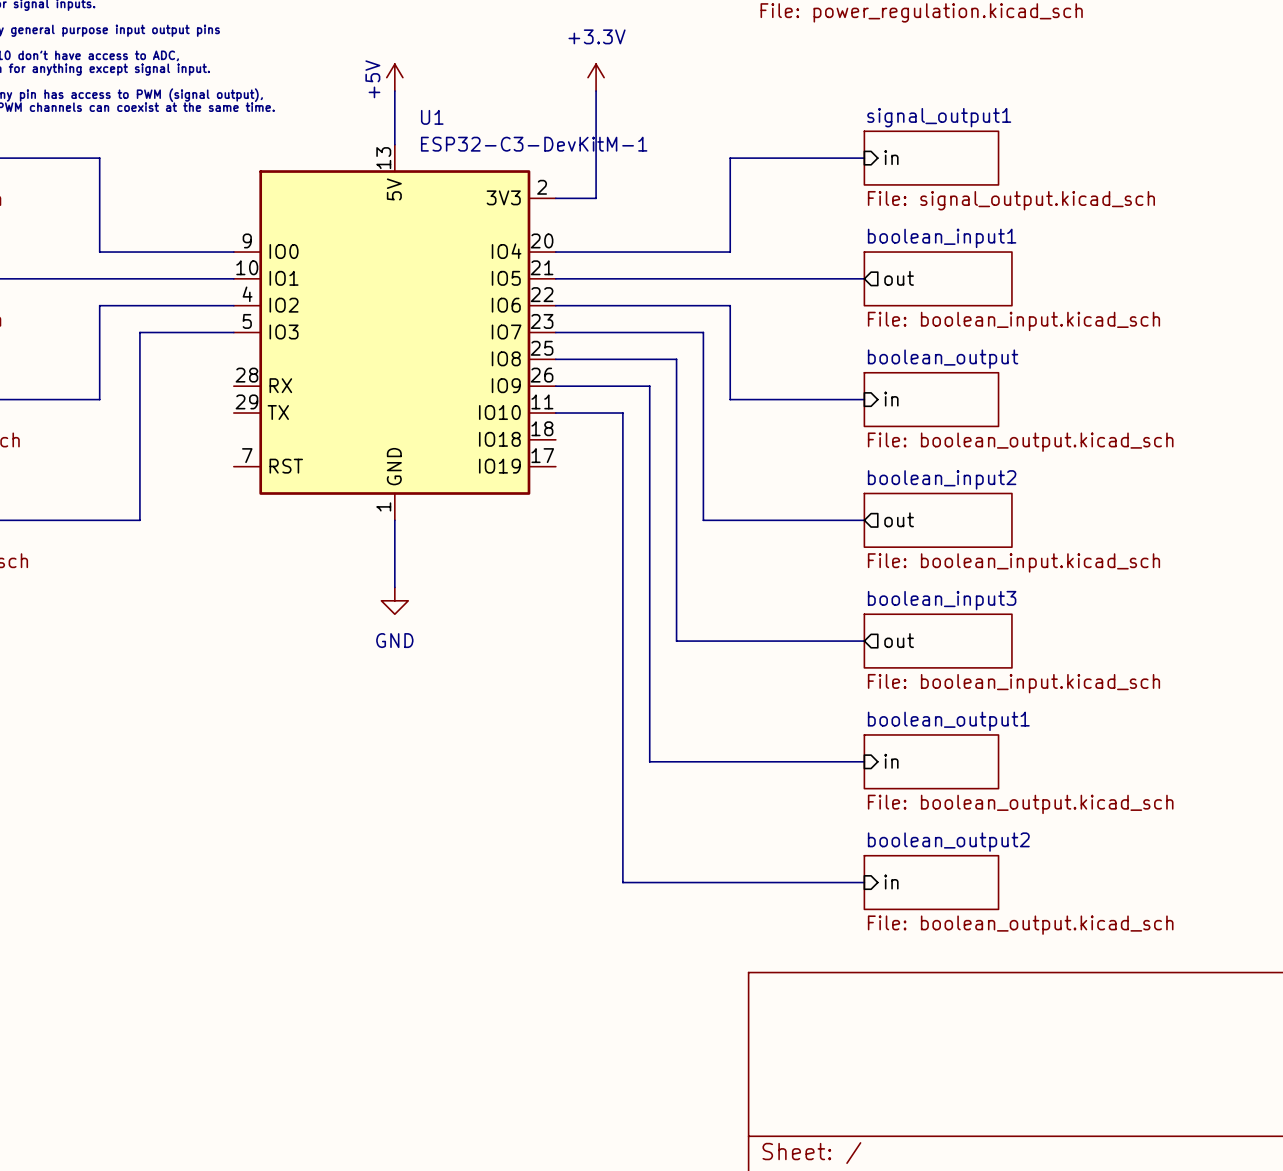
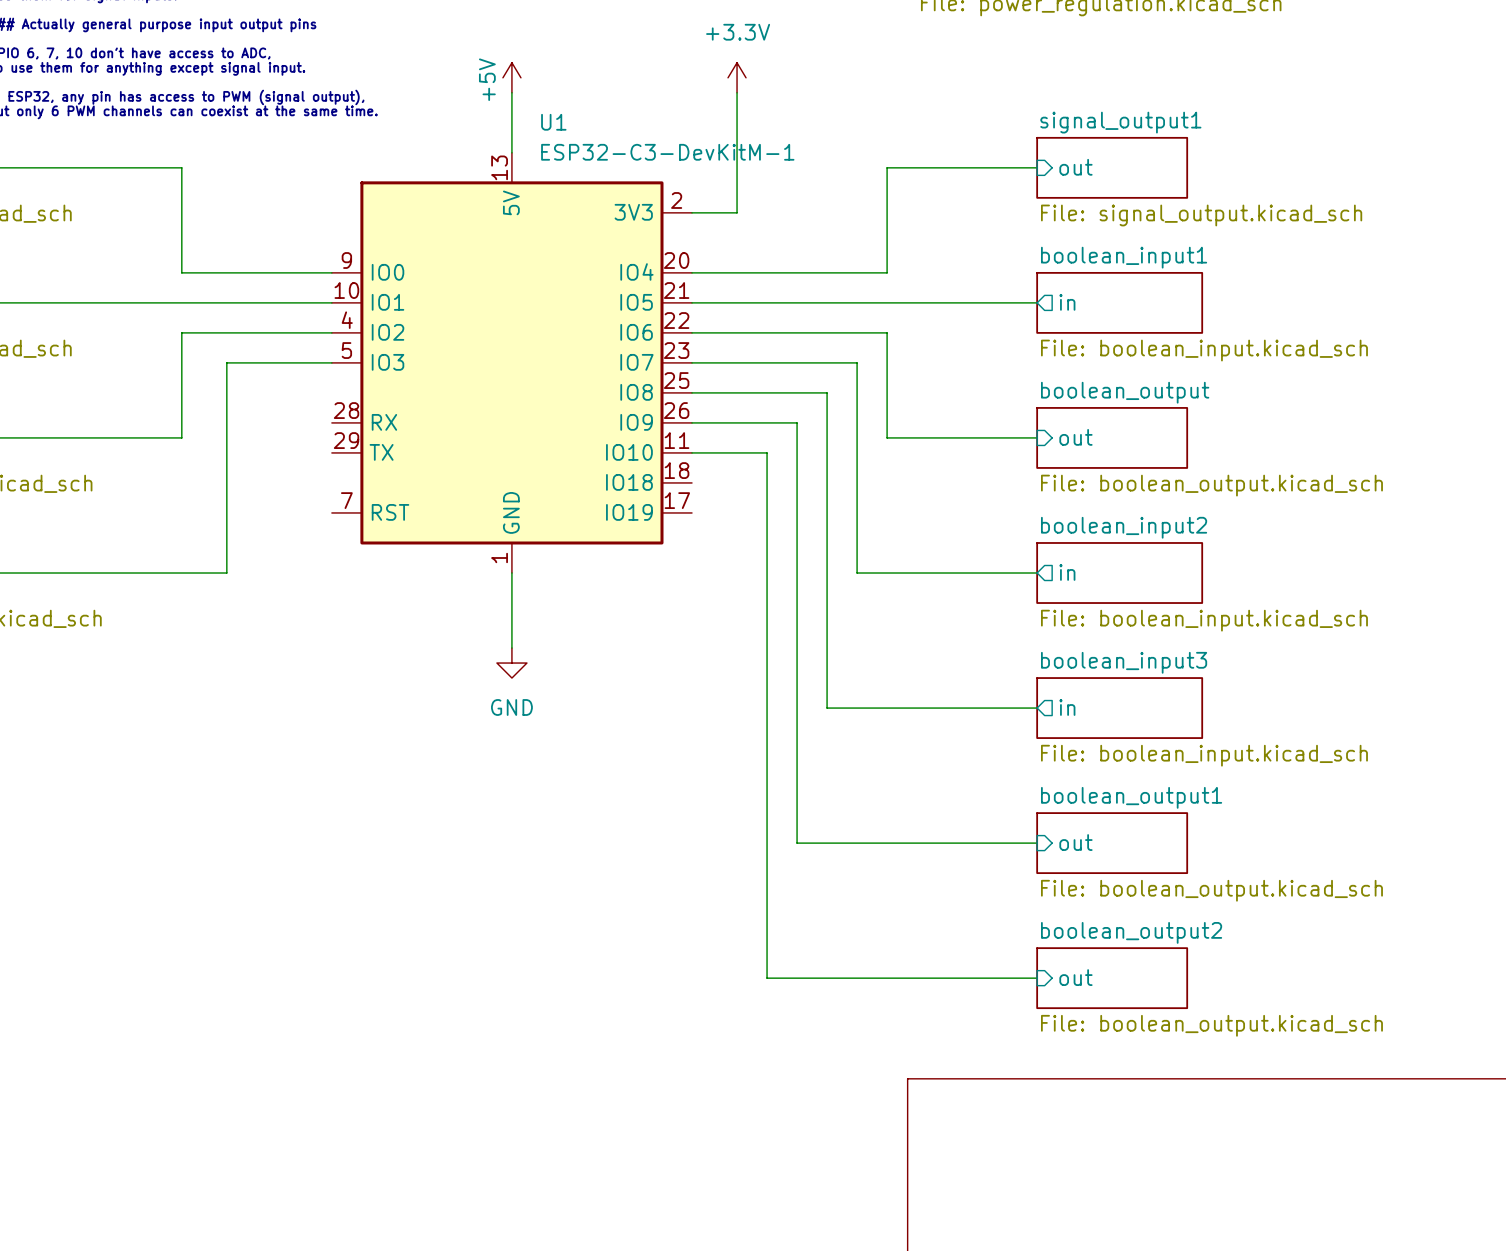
sheet pin: in (891, 157) -> out (1075, 167)
sheet pin: out (899, 278) -> in (1067, 302)
sheet pin: in (891, 399) -> out (1075, 437)
sheet pin: out (899, 519) -> in (1067, 572)
sheet pin: out (899, 640) -> in (1067, 707)
sheet pin: in (891, 761) -> out (1075, 842)
sheet pin: in (891, 882) -> out (1075, 977)

